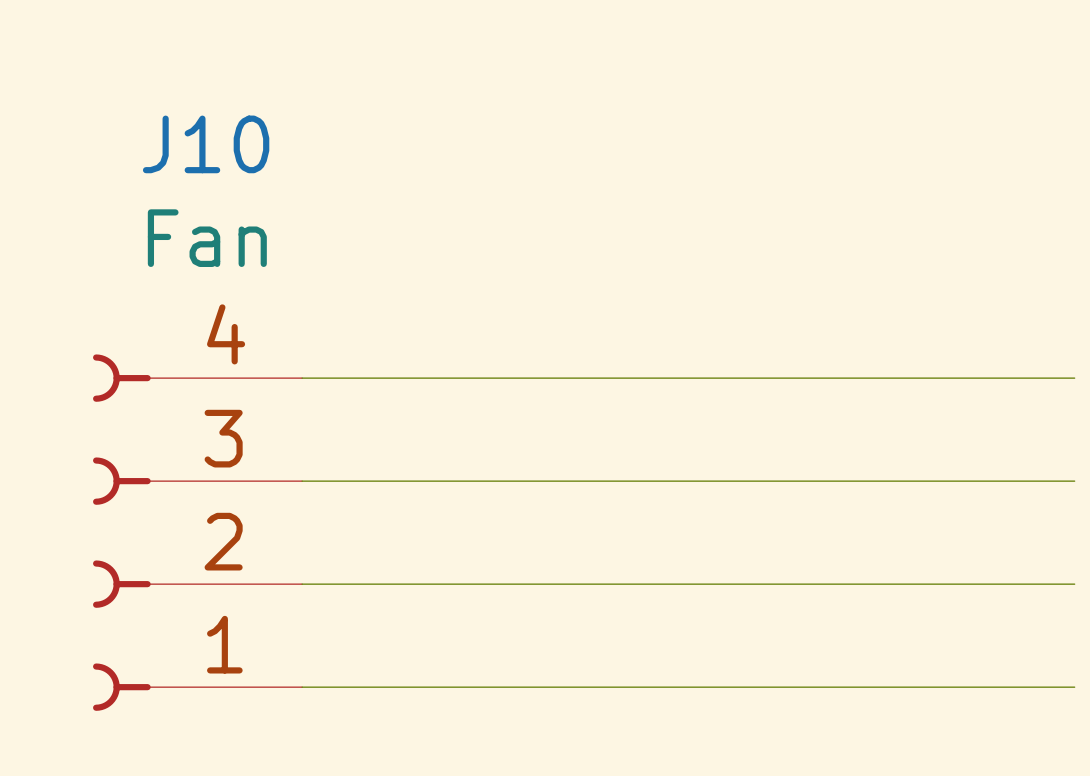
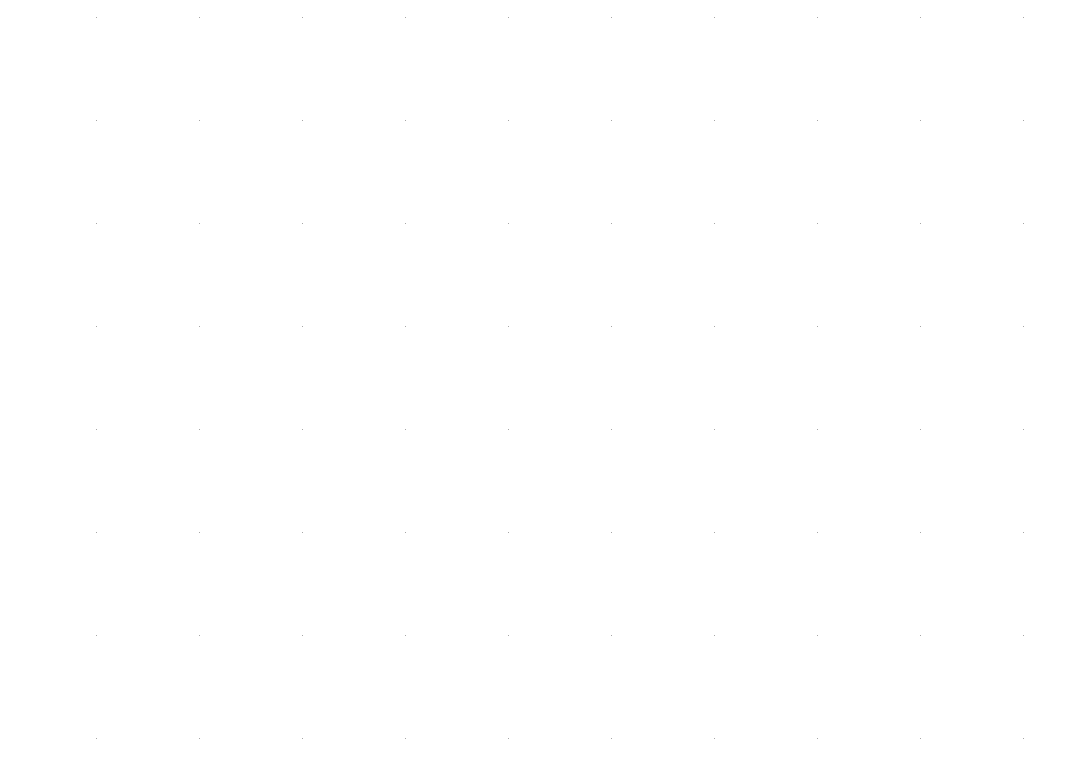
wire: (302, 378) (1074, 378) -> none
wire: (302, 481) (1074, 481) -> none
J10: Fan (197, 532) -> none
wire: (302, 584) (1074, 584) -> none
wire: (302, 687) (1074, 687) -> none

